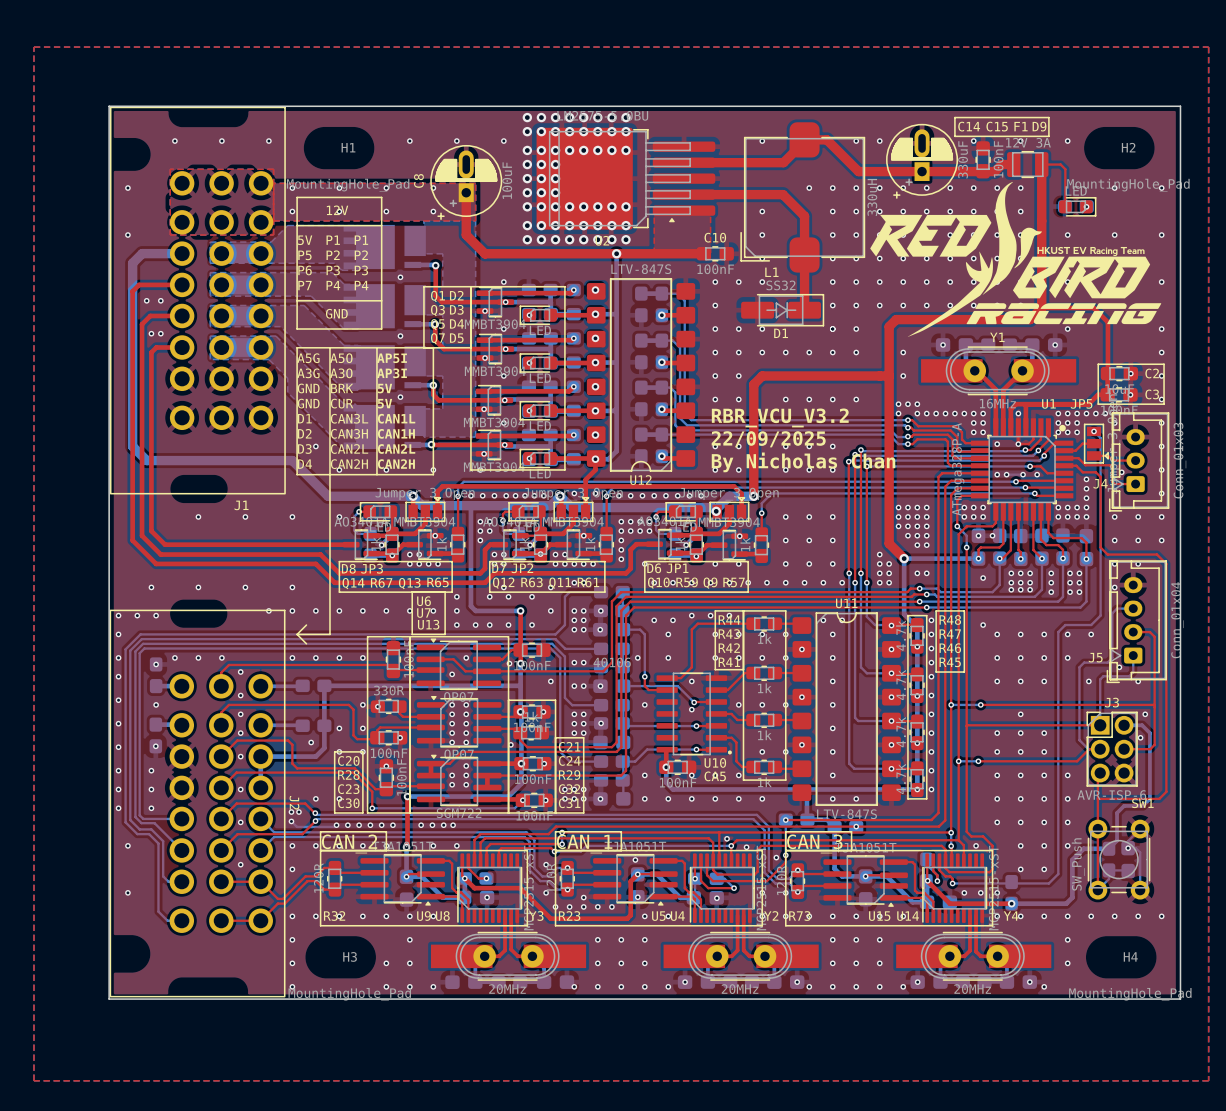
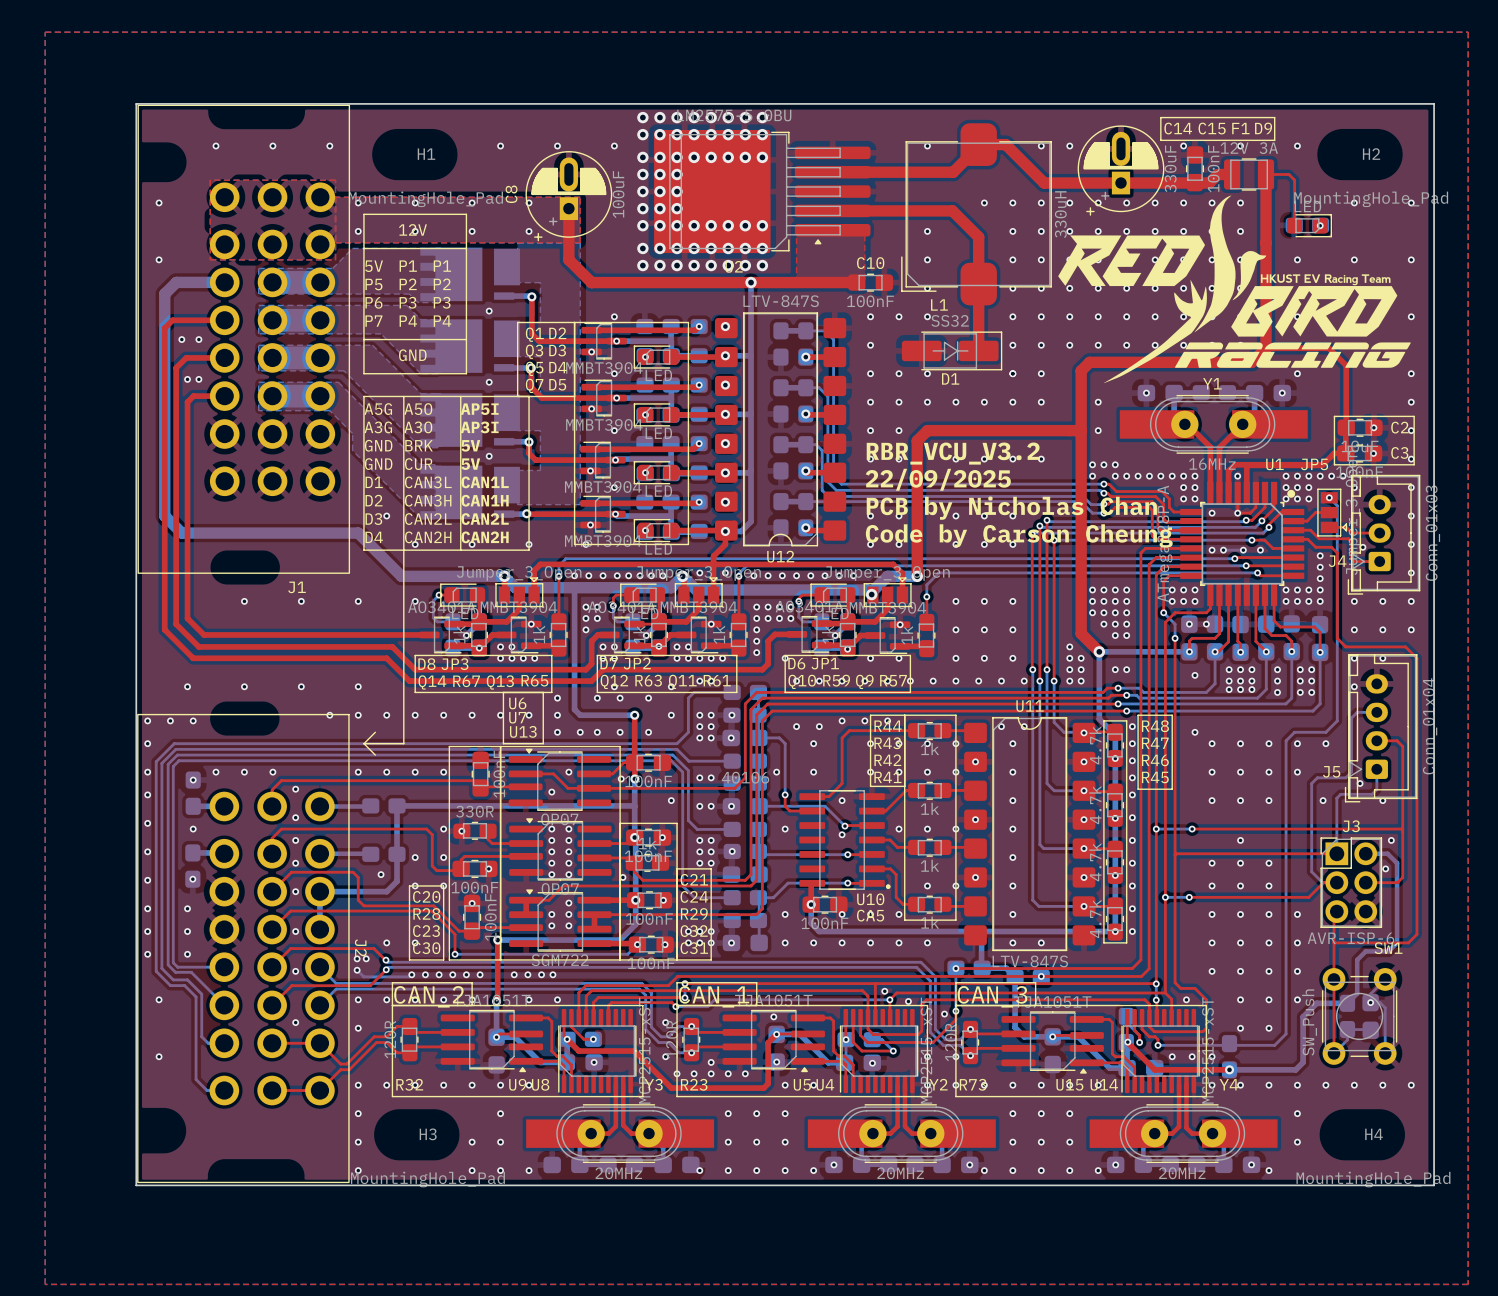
text: none -> RBR_VCU_V3.2 (953, 453)
text: RBR_VCU_V3.2 (780, 417) -> 22/09/2025 (938, 479)
text: 22/09/2025 (768, 439) -> PCB by Nicholas Chan (1011, 508)
text: By Nicholas Chan (803, 462) -> Code by Carson Cheung (1019, 535)

